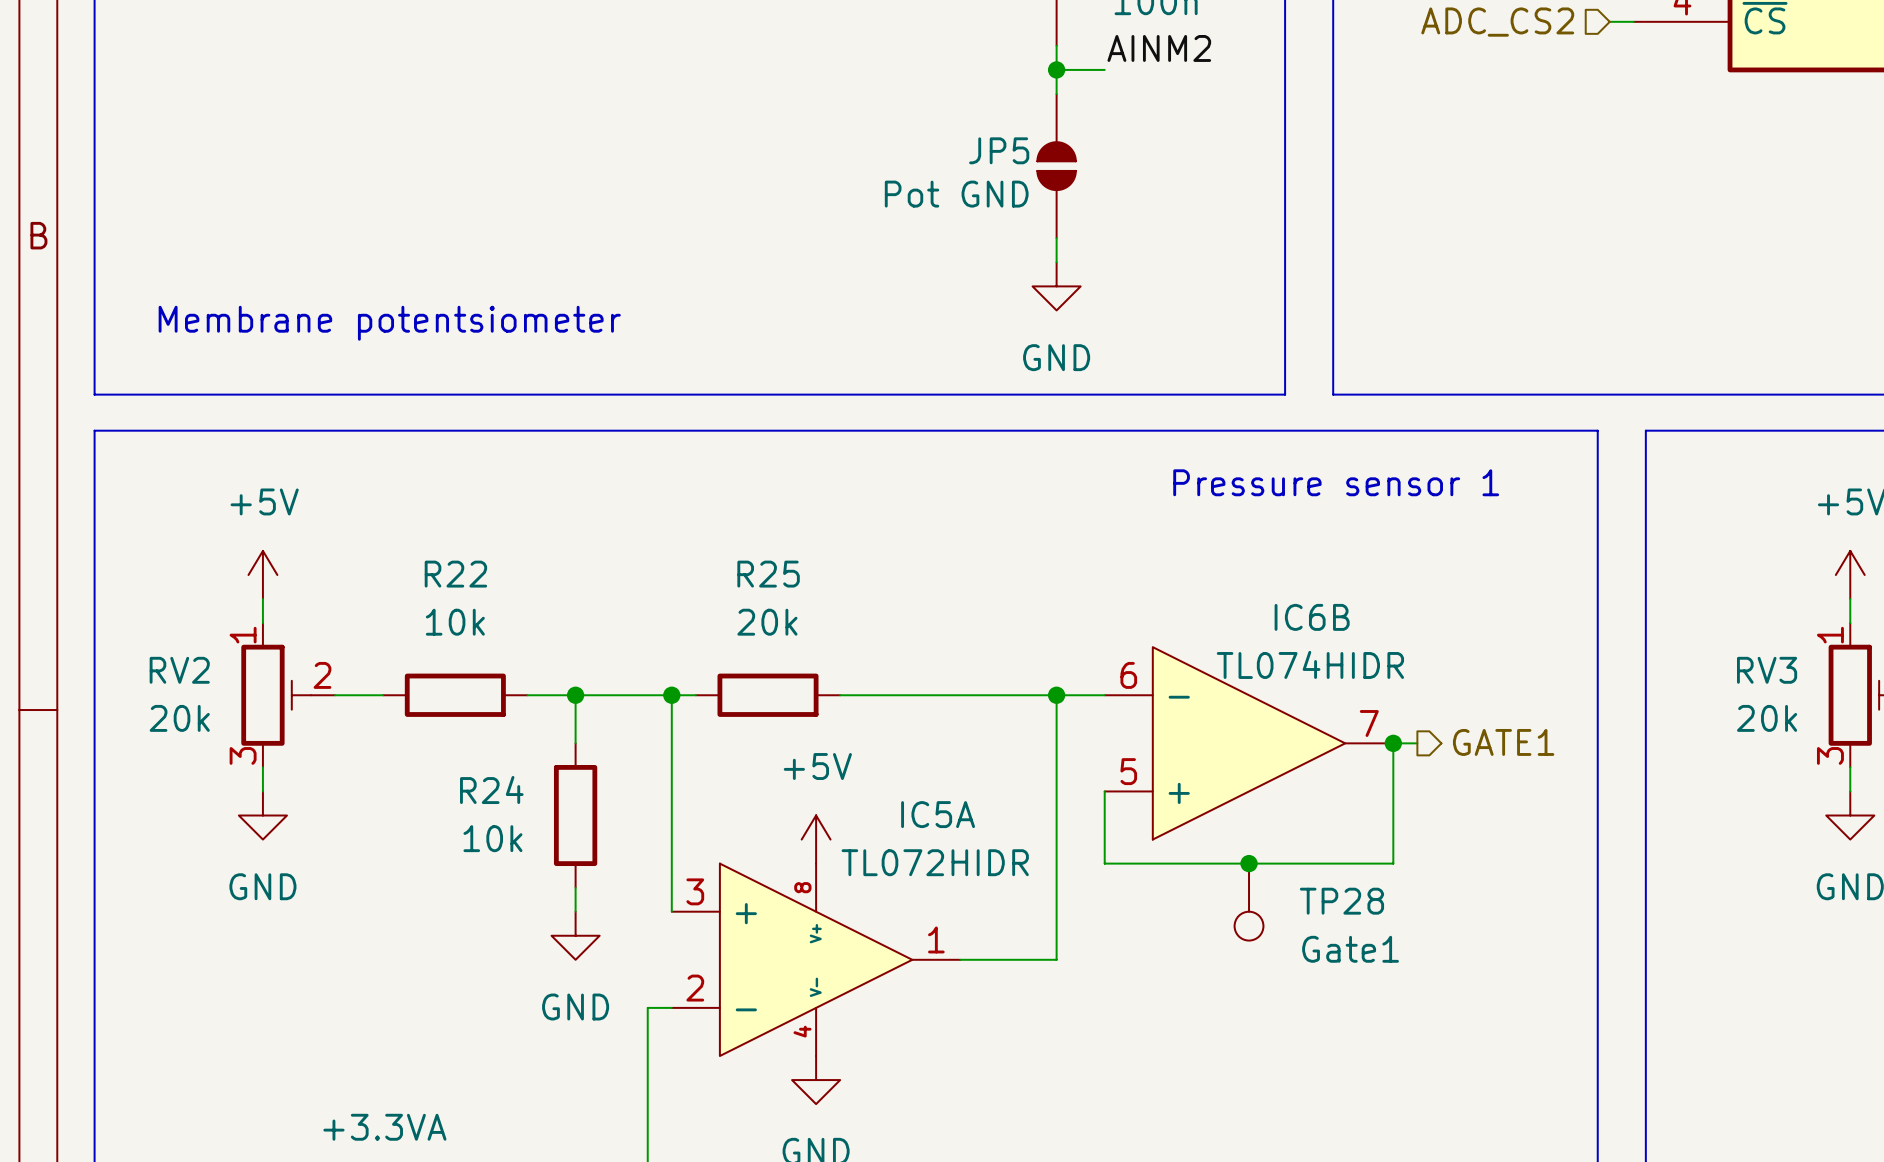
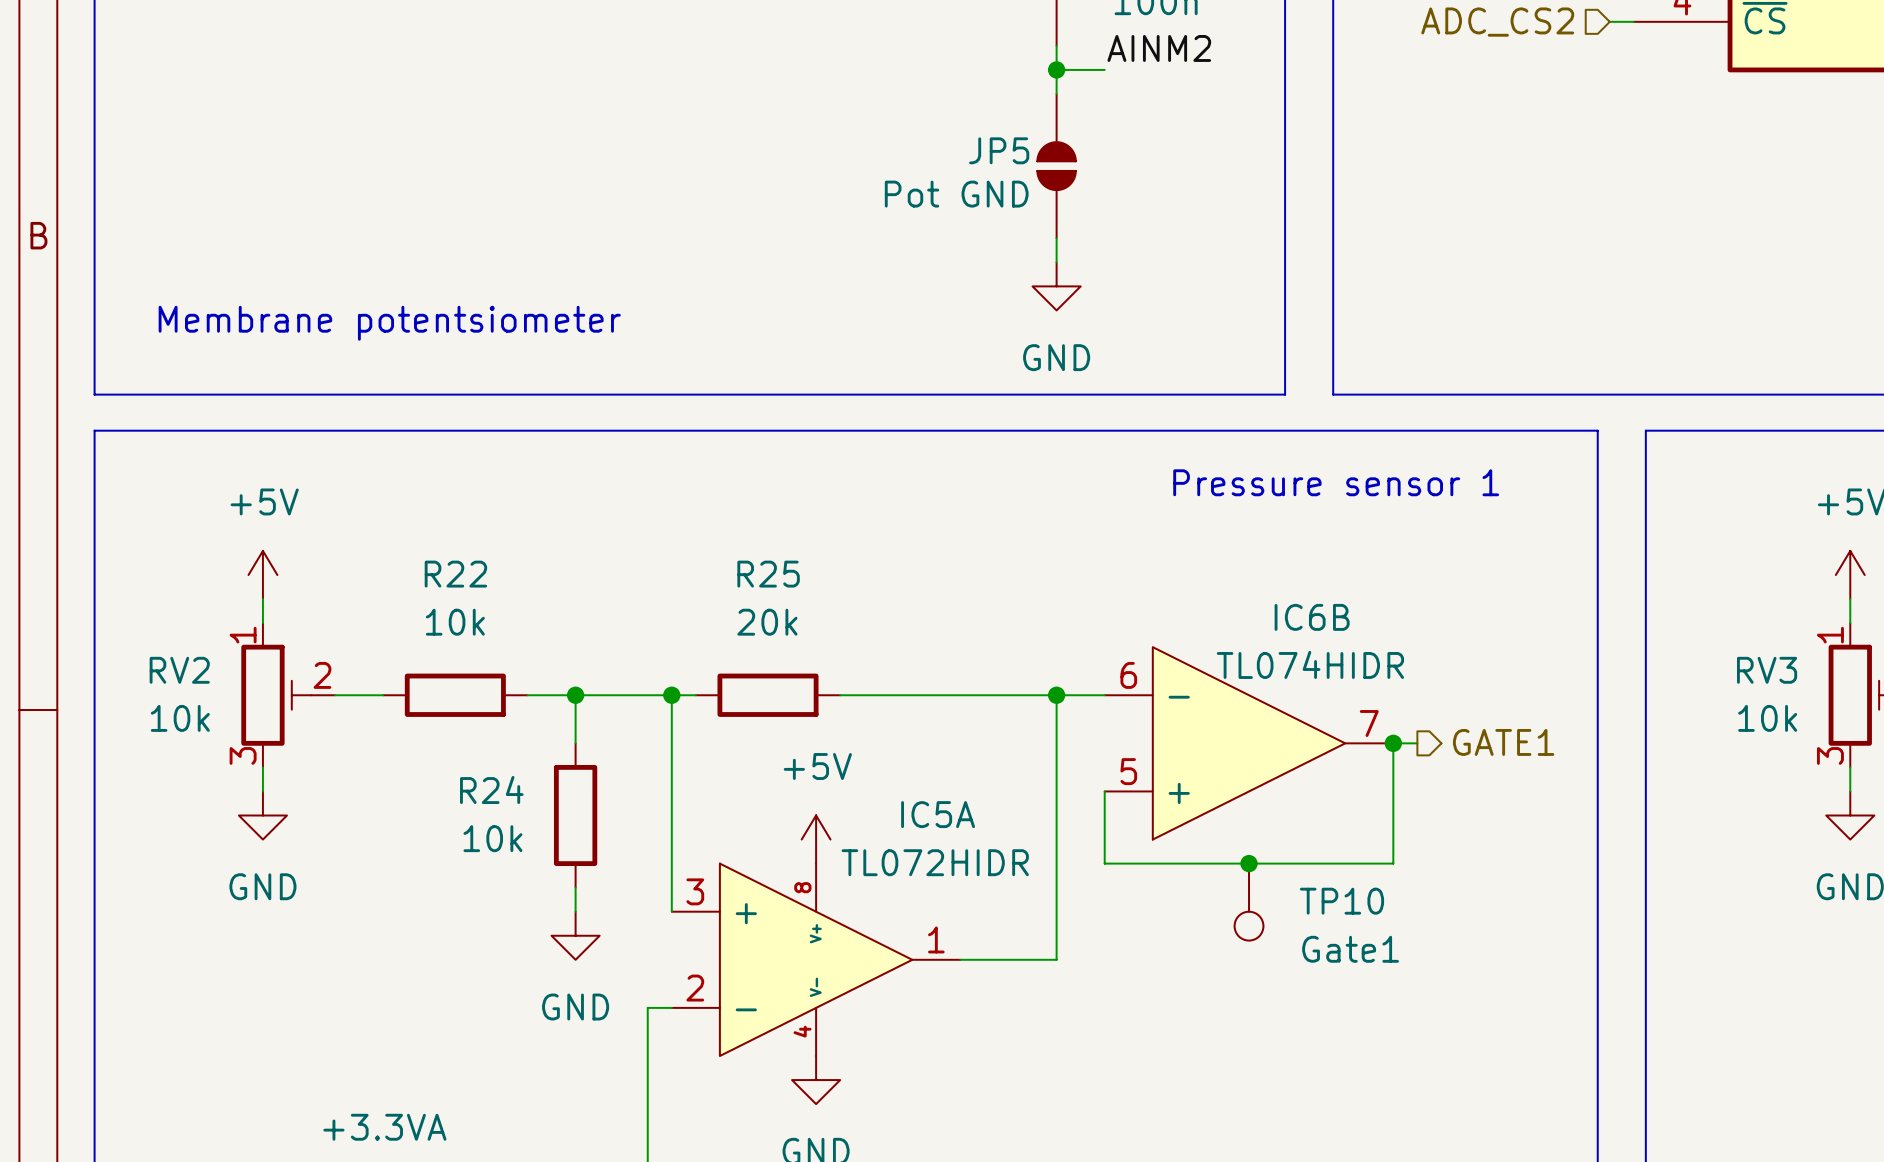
RV2 value: 20k (179, 718) -> 10k (180, 718)
RV3 value: 20k (1767, 718) -> 10k (1767, 718)
TP28 name: TP28 (1341, 901) -> TP10 (1341, 901)

